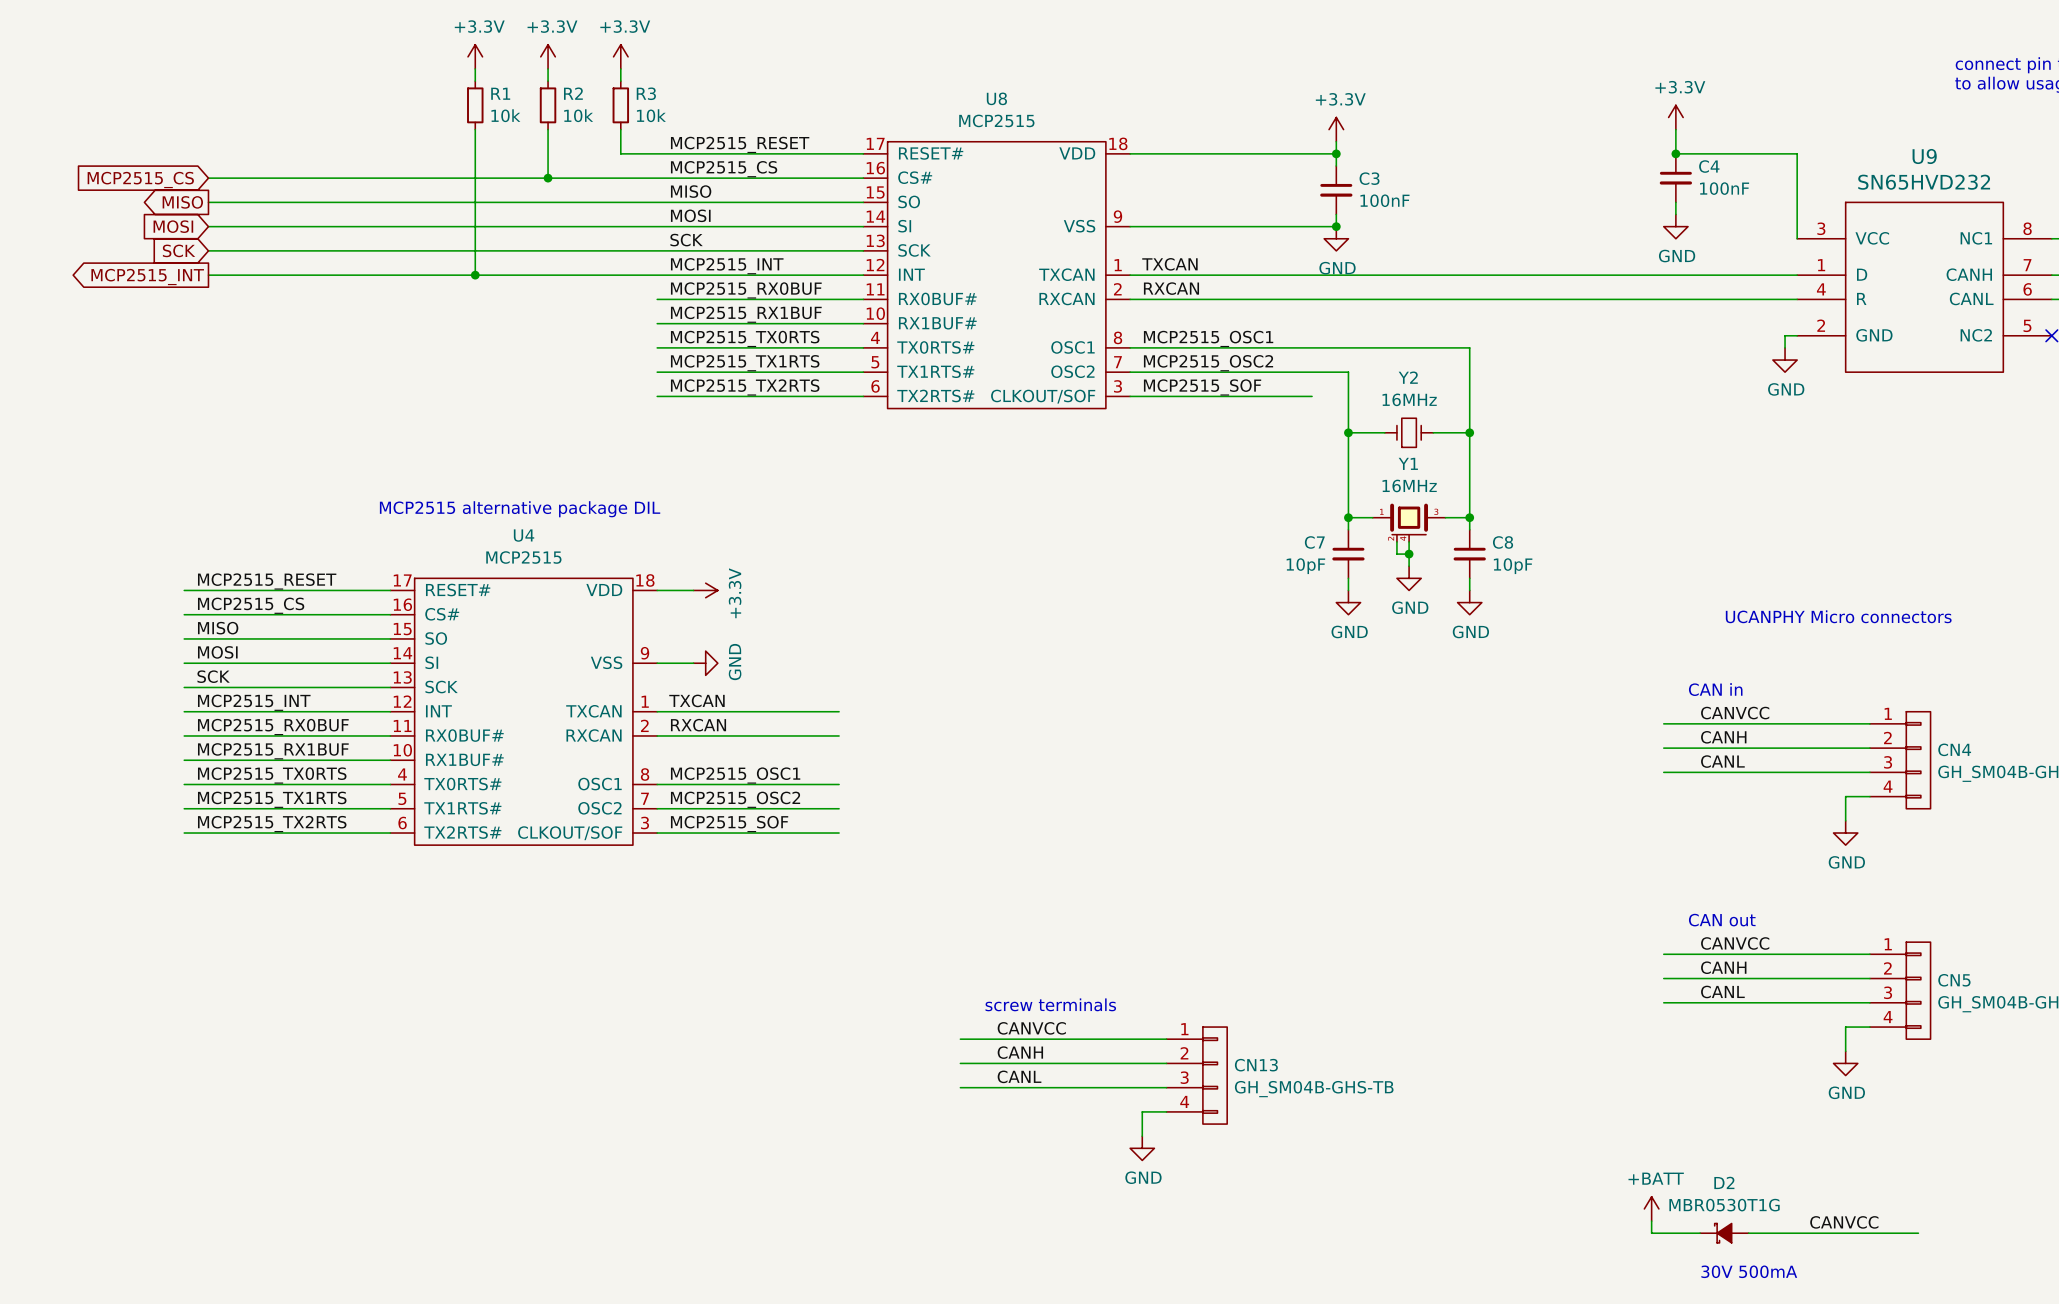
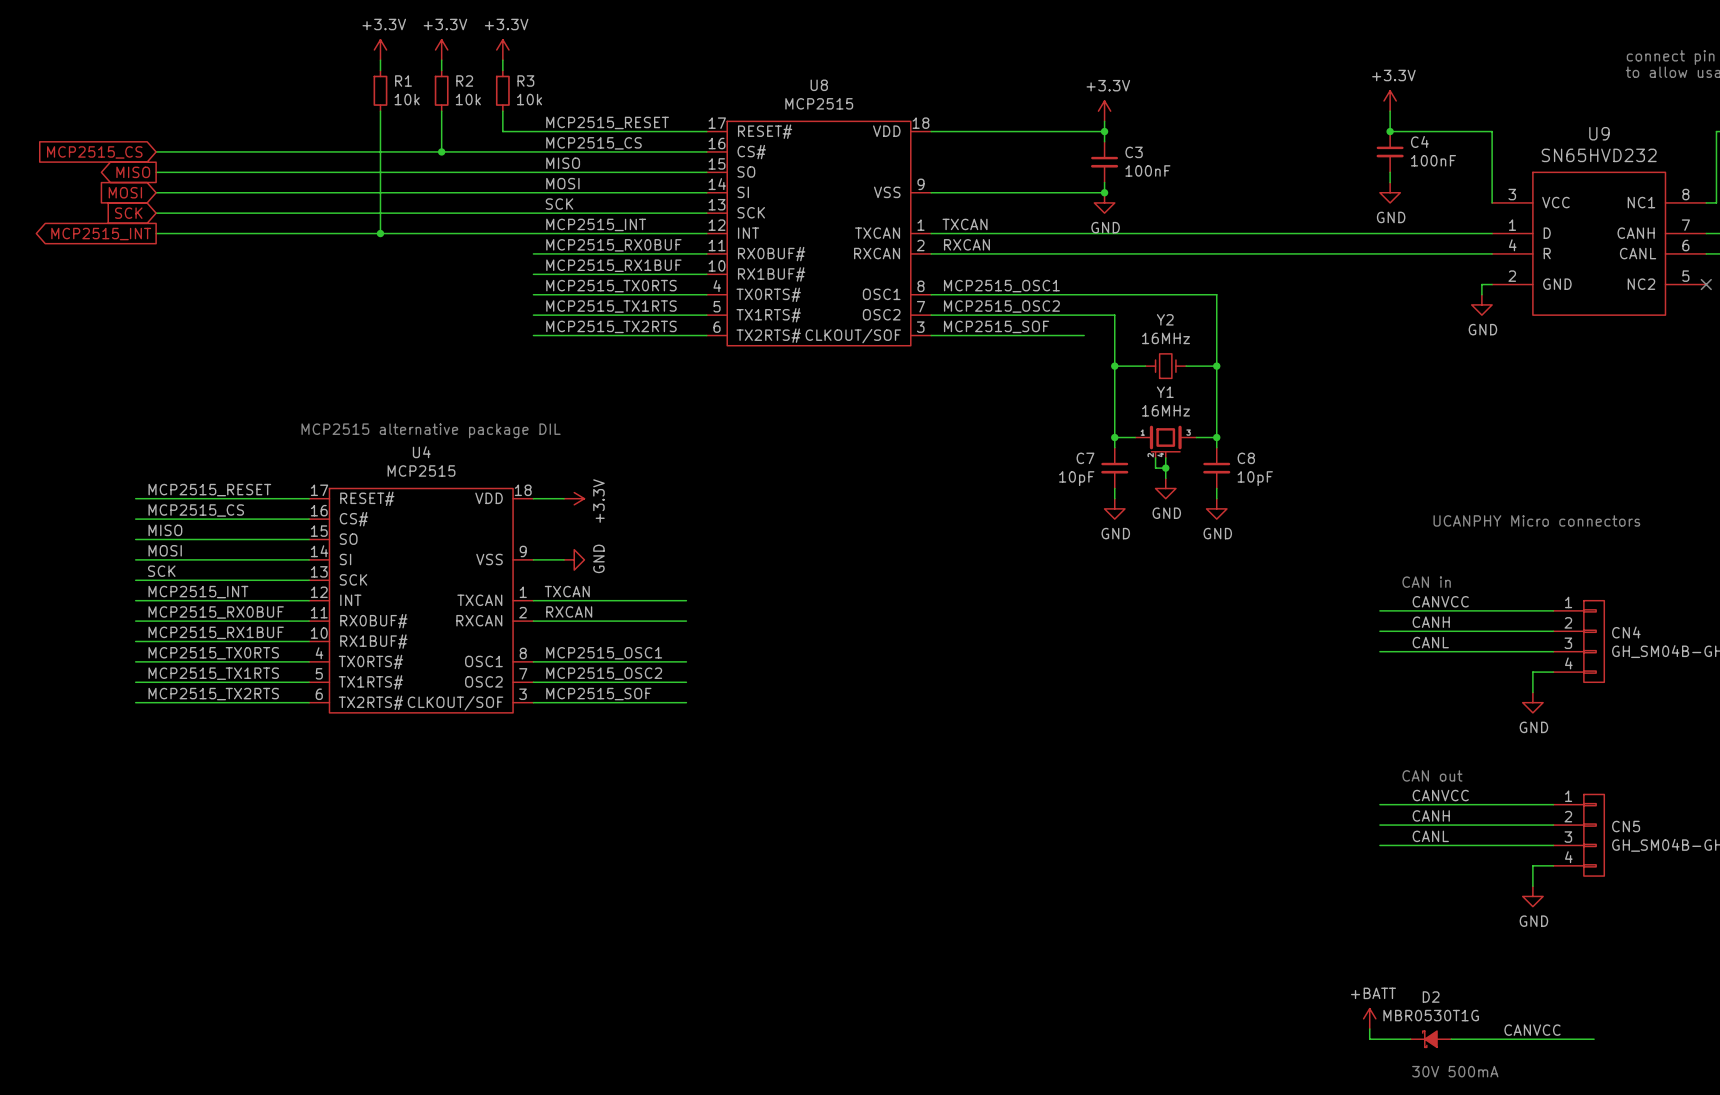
text: screw terminals (1050, 1004) -> none
label: CANVCC (1031, 1028) -> none
wire: (960, 1039) (1166, 1039) -> none
label: CANH (1020, 1052) -> none
wire: (960, 1063) (1166, 1063) -> none
CN13: GH_SM04B-GHS-TB (1196, 1075) -> none
label: CANL (1019, 1076) -> none
wire: (960, 1087) (1166, 1087) -> none
wire: (1166, 1111) (1142, 1111) (1142, 1136) -> none
power symbol: GND (1142, 1148) -> none

